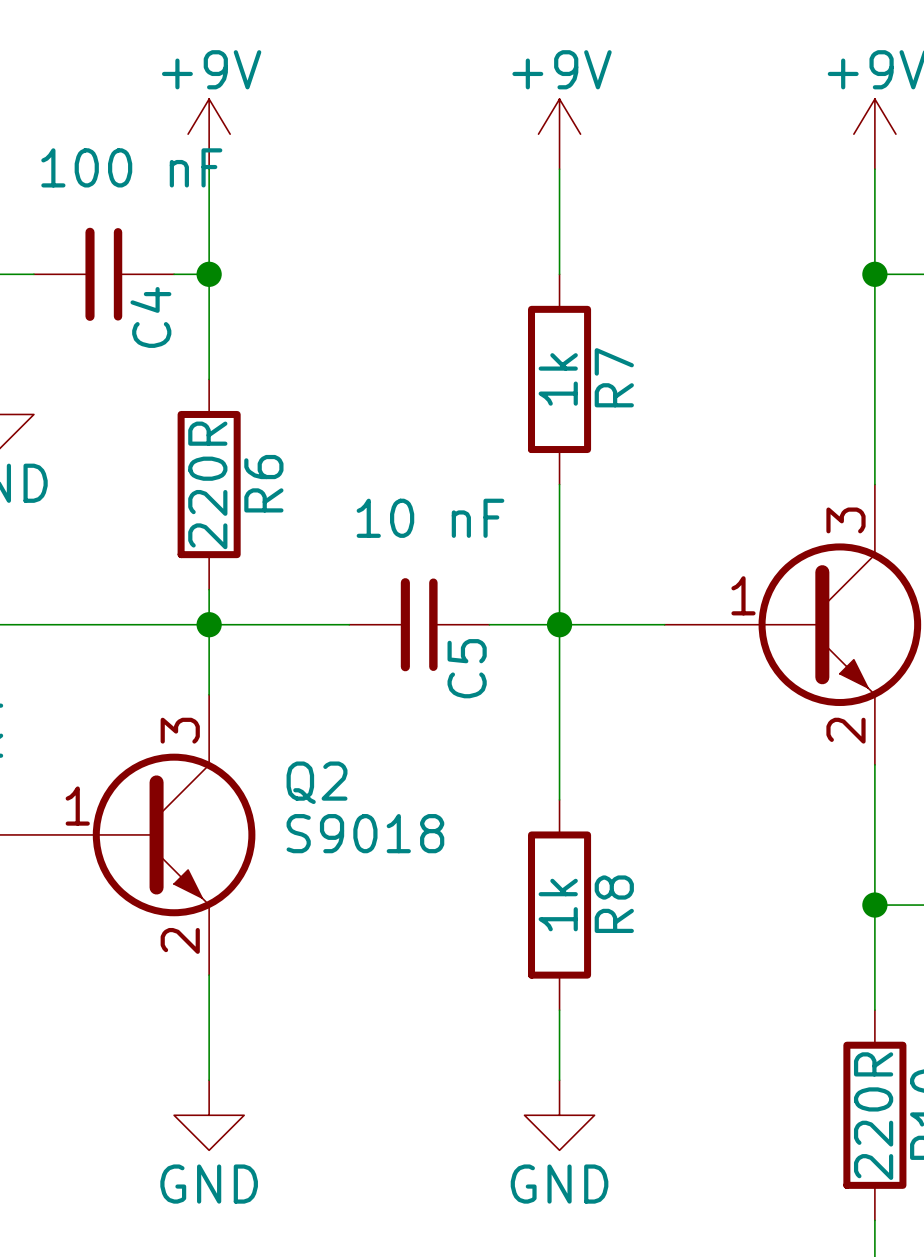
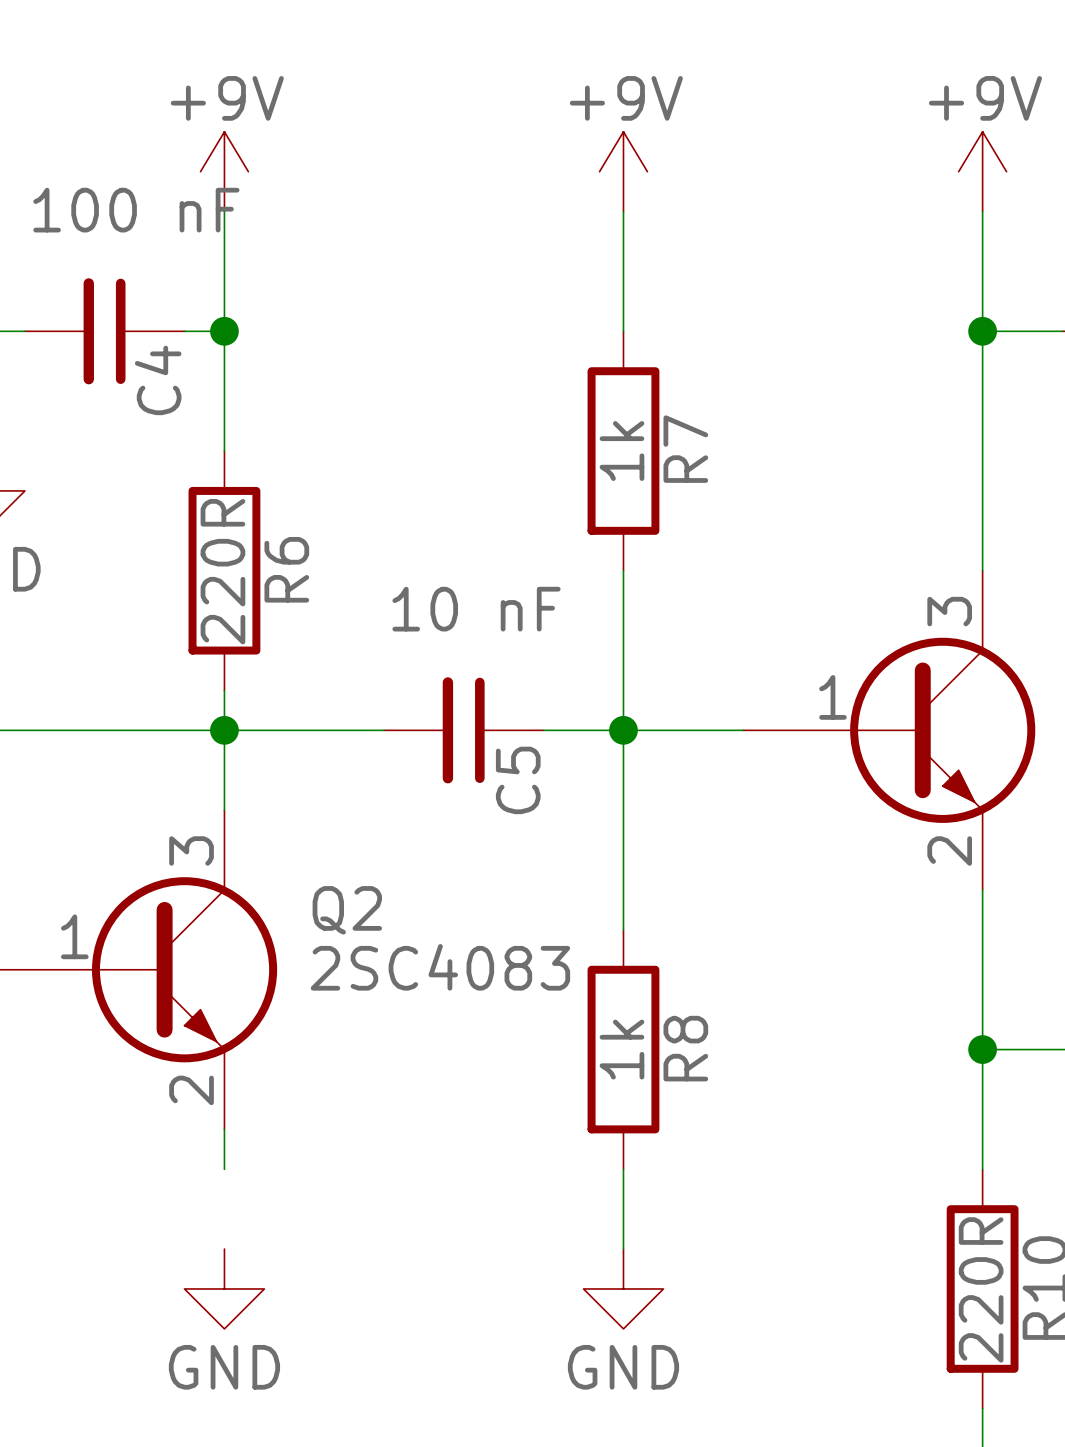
Q2 value: S9018 (365, 833) -> 2SC4083 (440, 967)
wire: (209, 1010) (209, 1080) -> none

